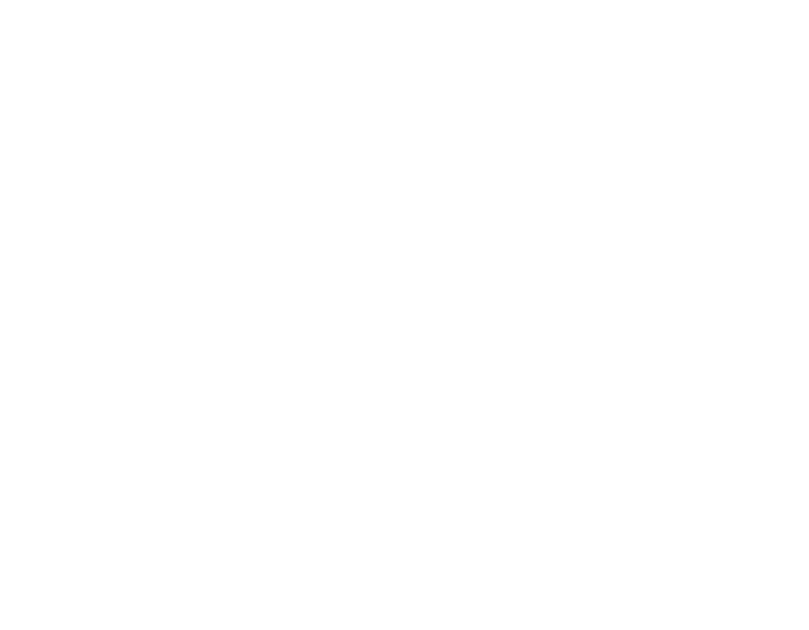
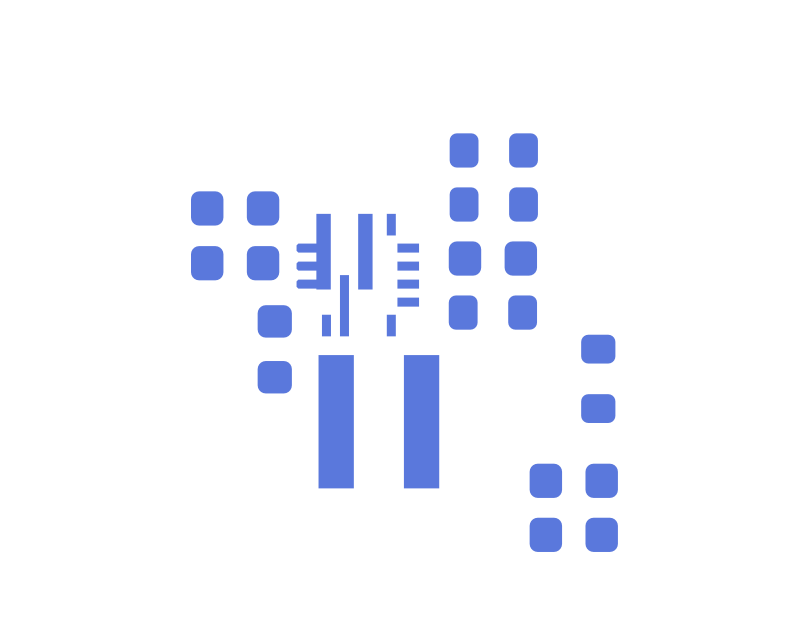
part: none -> (493, 150)
part: none -> (493, 204)
part: none -> (235, 208)
part: none -> (492, 258)
part: none -> (235, 263)
part: none -> (357, 275)
part: none -> (492, 312)
part: none -> (274, 349)
part: none -> (598, 378)
part: none -> (378, 421)
part: none -> (573, 480)
part: none -> (573, 534)

